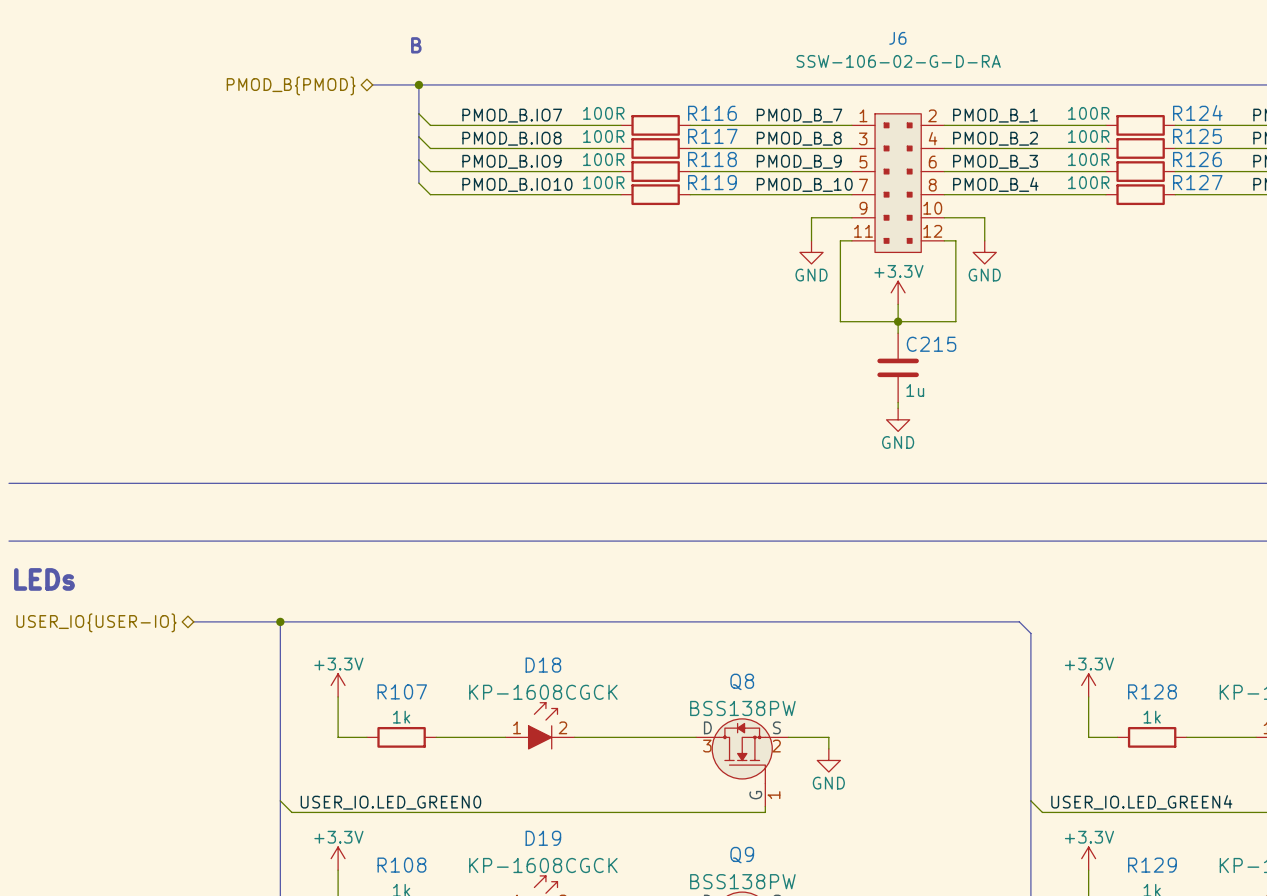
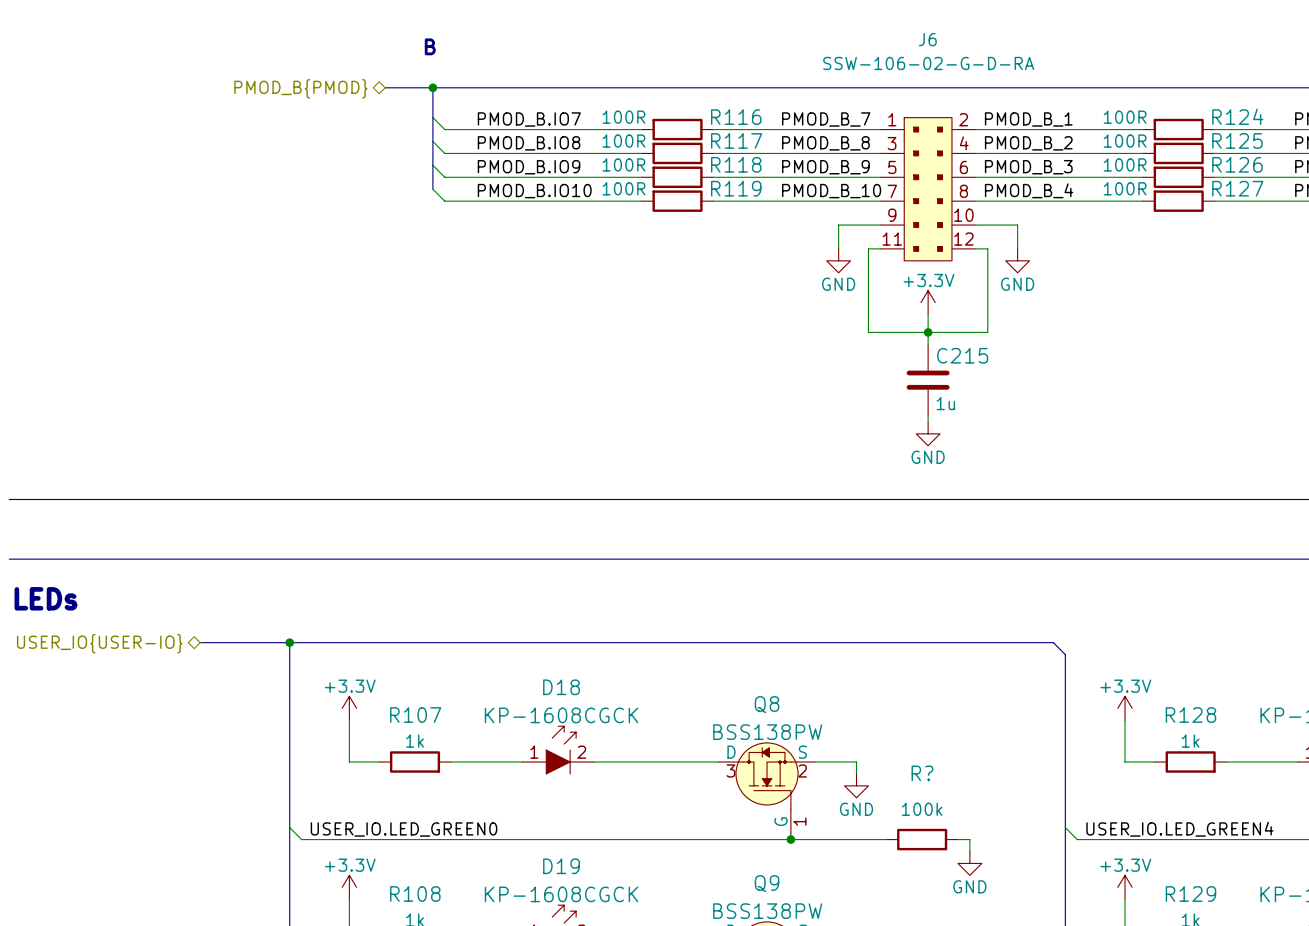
wire: none -> (790, 839) (886, 839)
junction: none -> (790, 839)
R?: none -> (922, 839)
wire: none -> (957, 839) (969, 839) (969, 851)
power symbol: none -> GND (969, 863)

